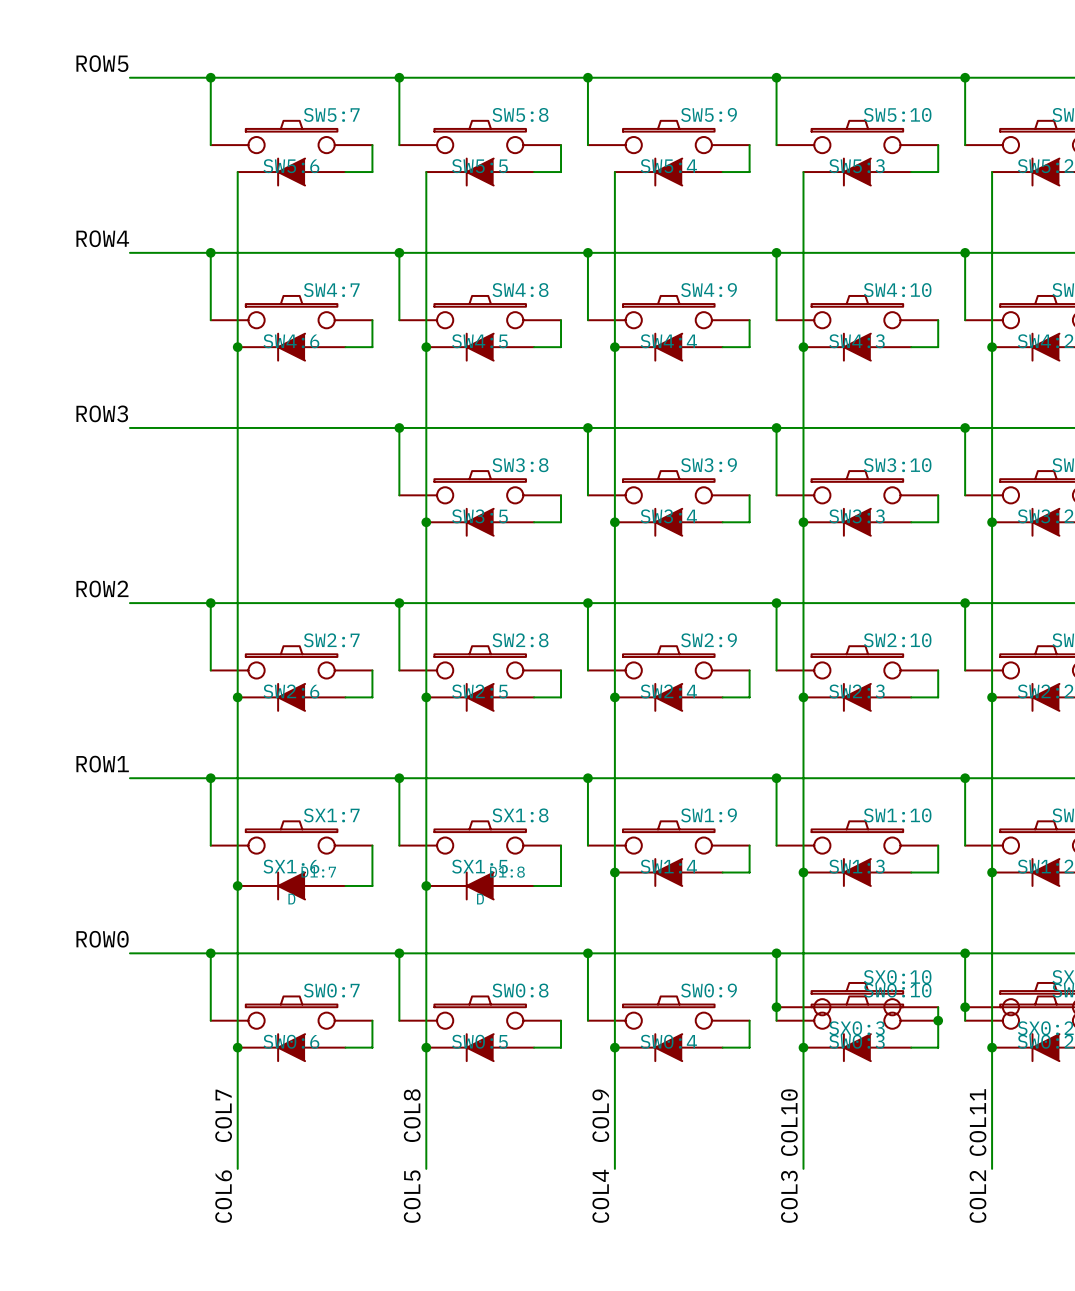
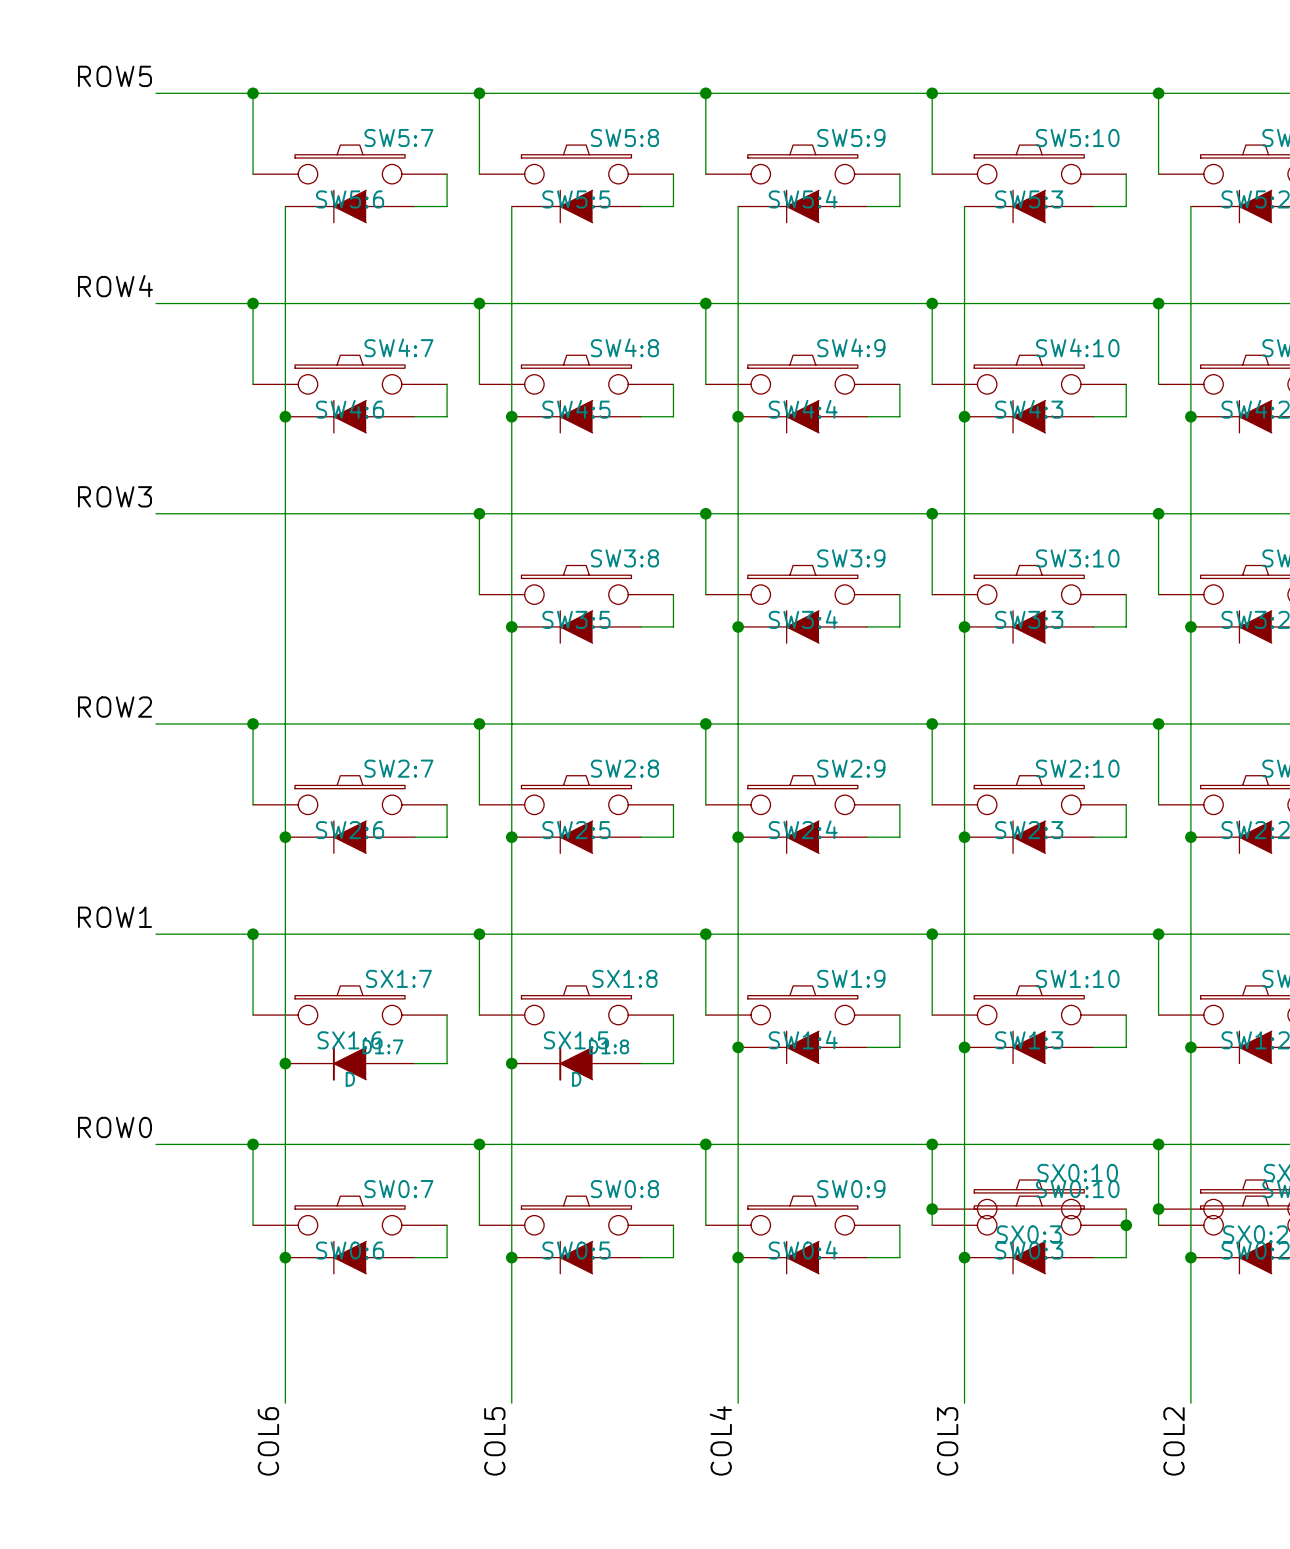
label: COL7 (223, 1115) -> none
label: COL8 (412, 1115) -> none
label: COL9 (600, 1115) -> none
label: COL10 (789, 1122) -> none
label: COL11 (977, 1122) -> none

